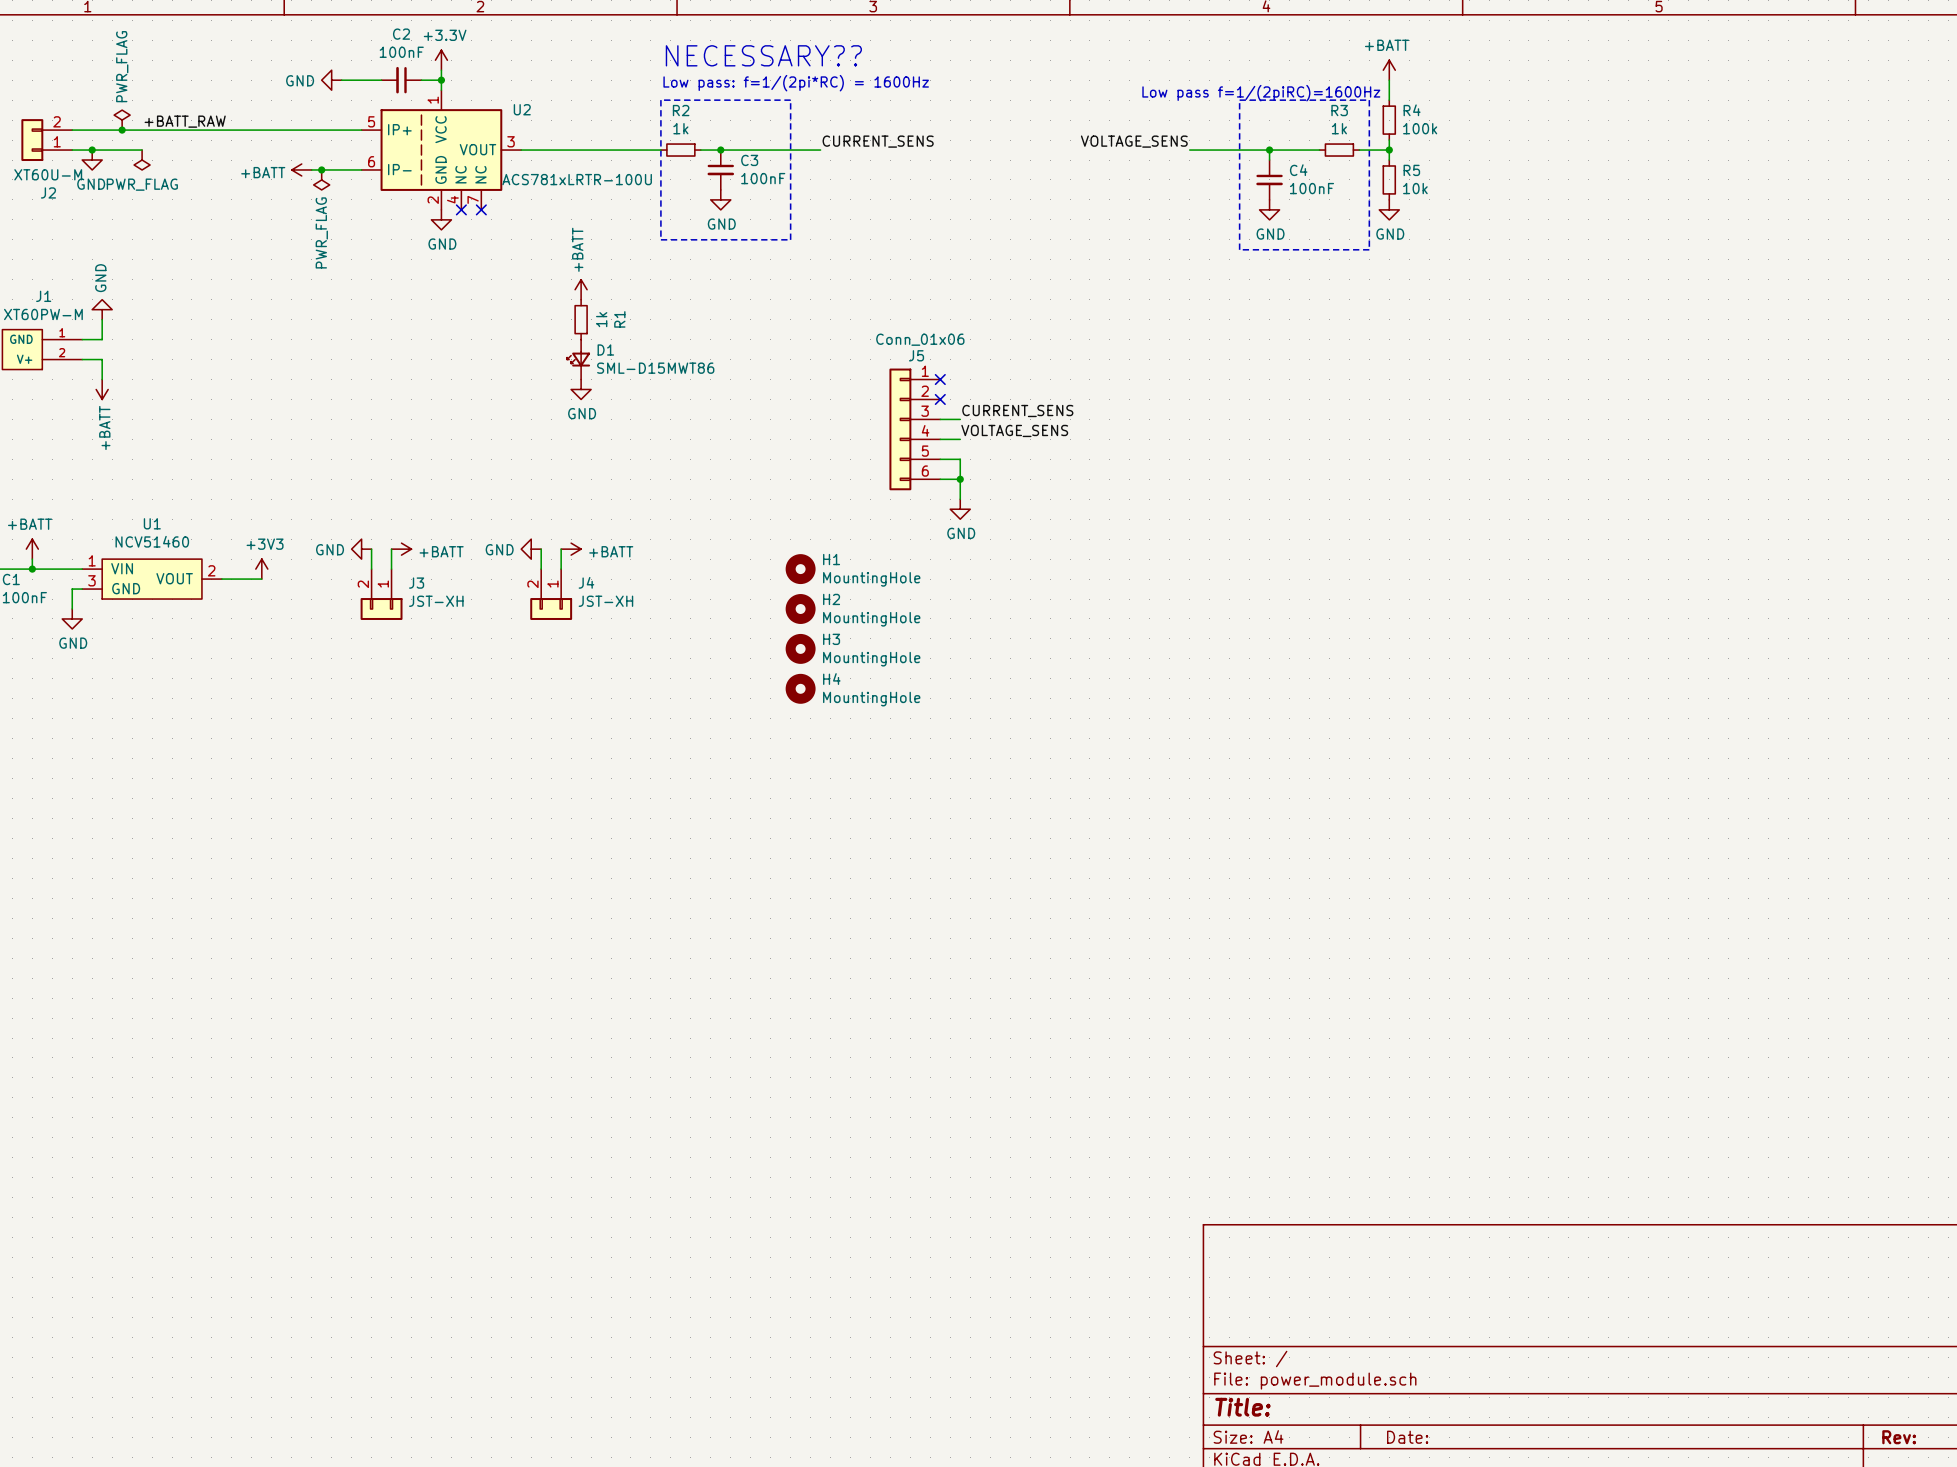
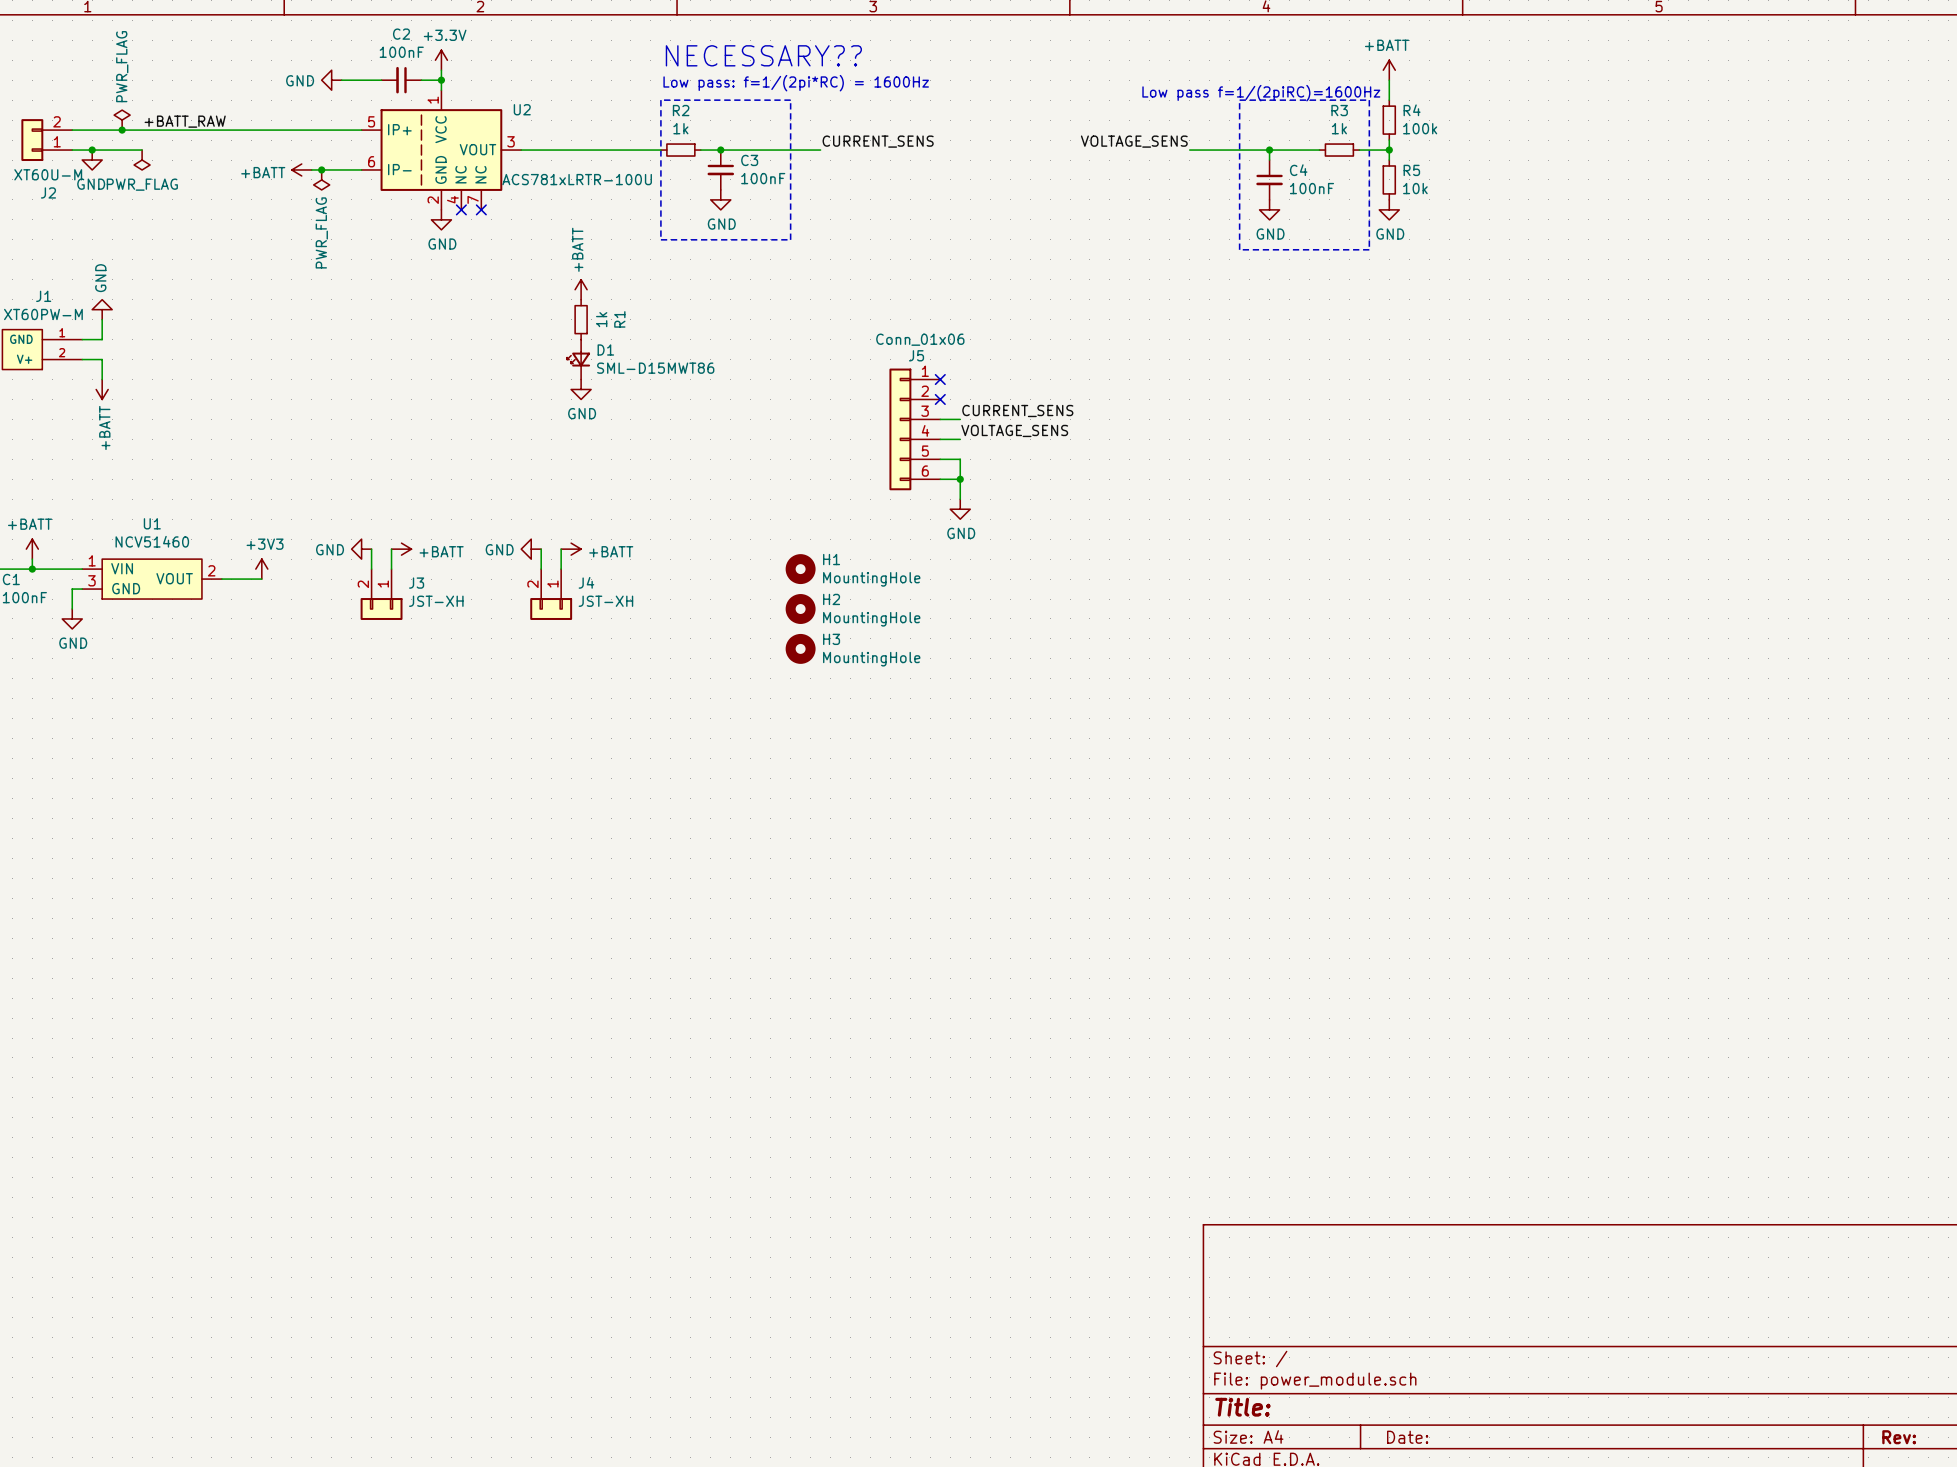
H4: MountingHole (800, 688) -> none

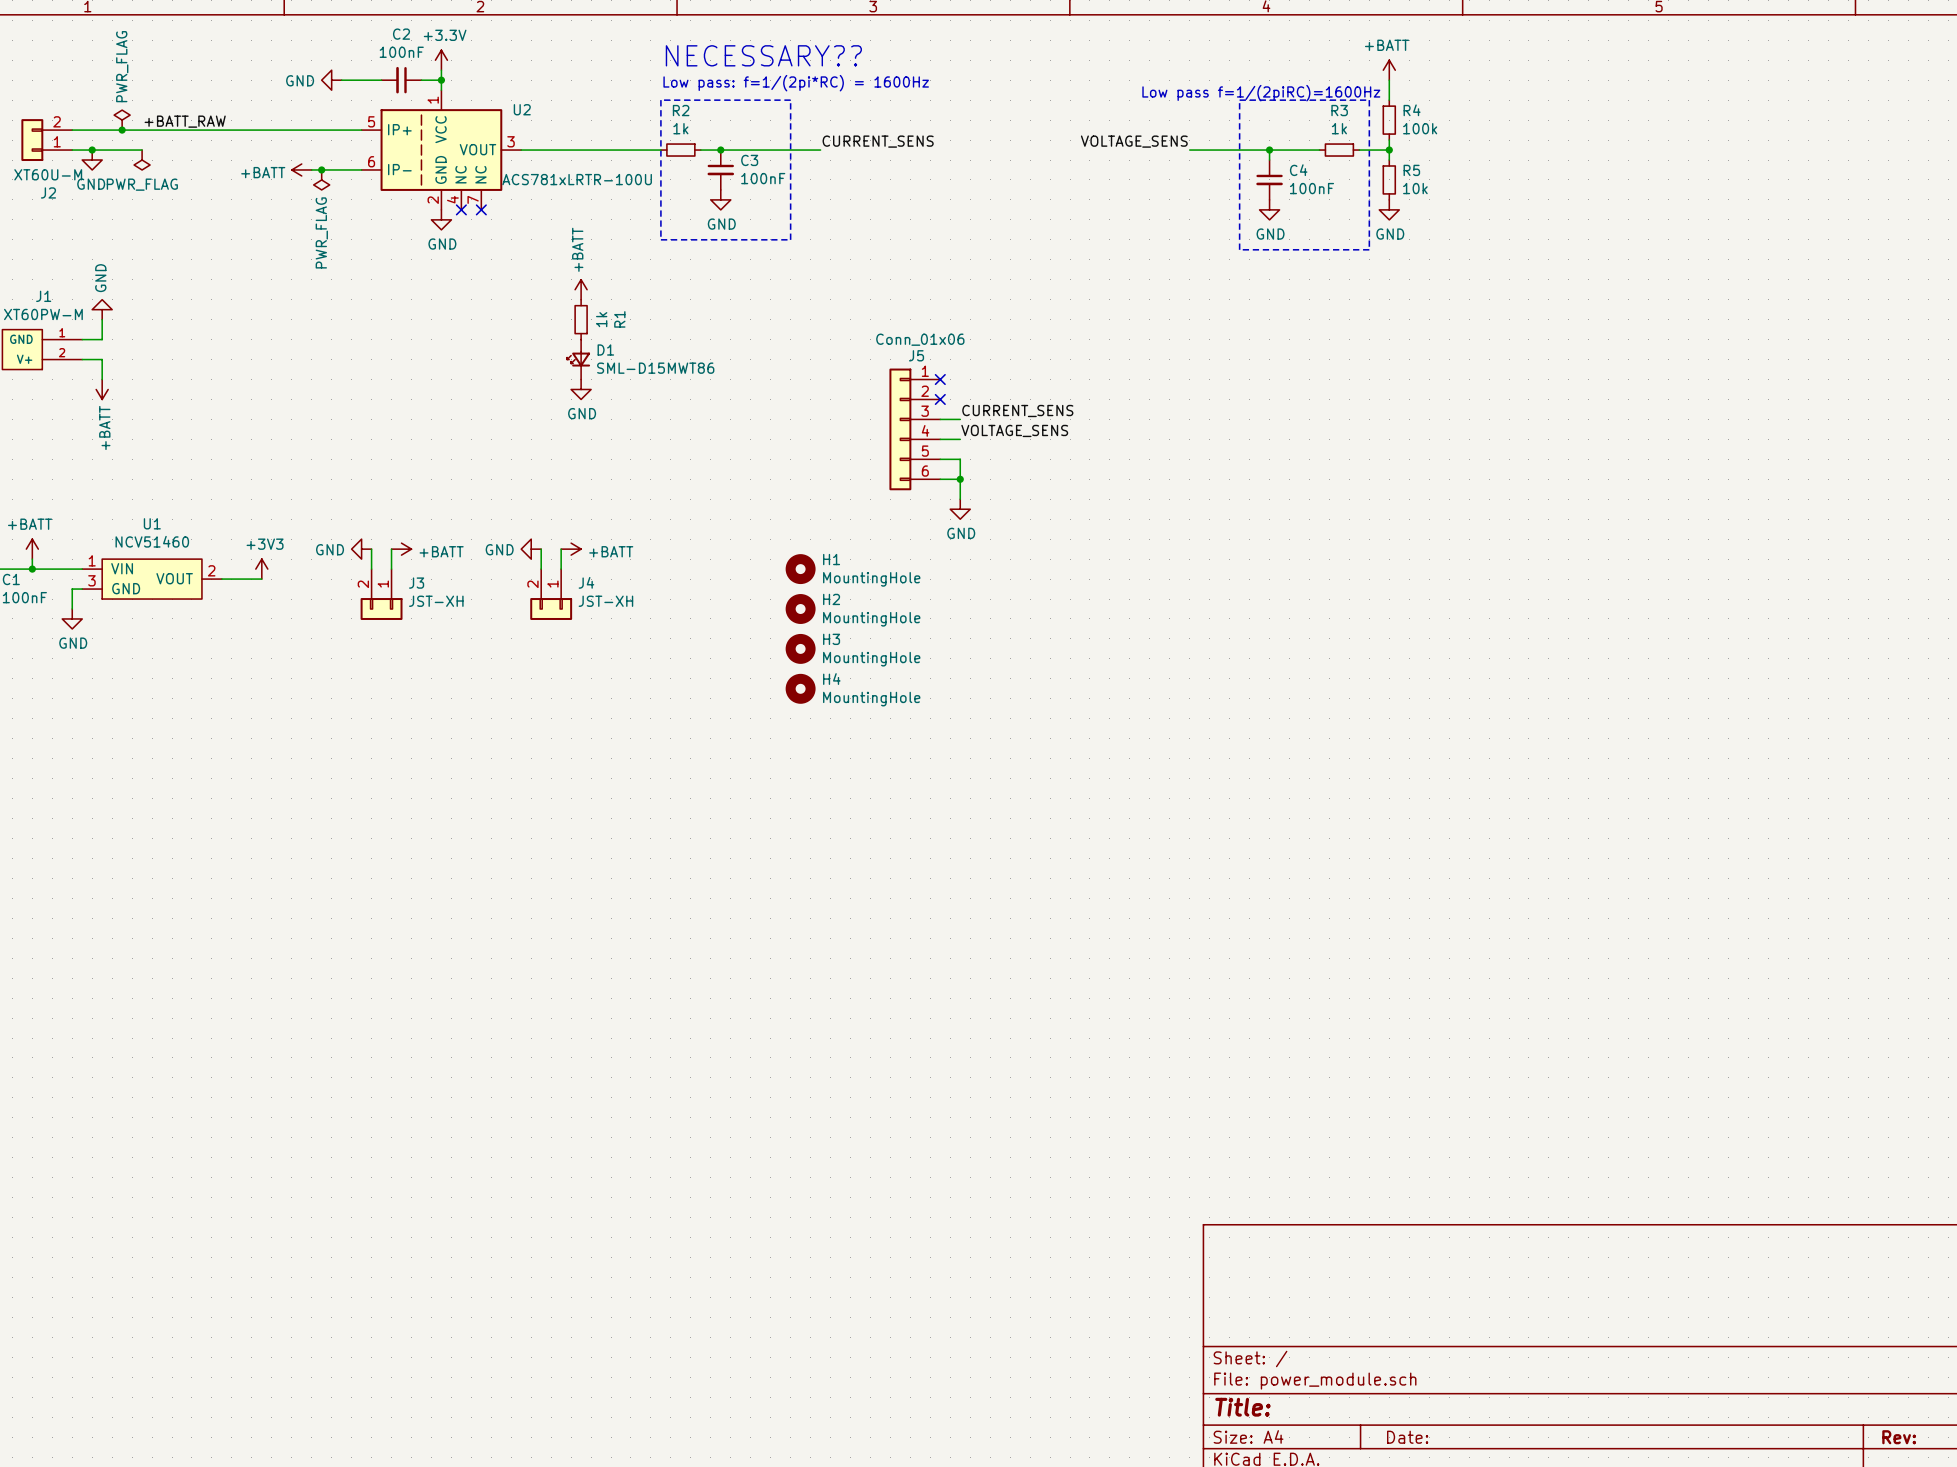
H4: none -> MountingHole (800, 688)

